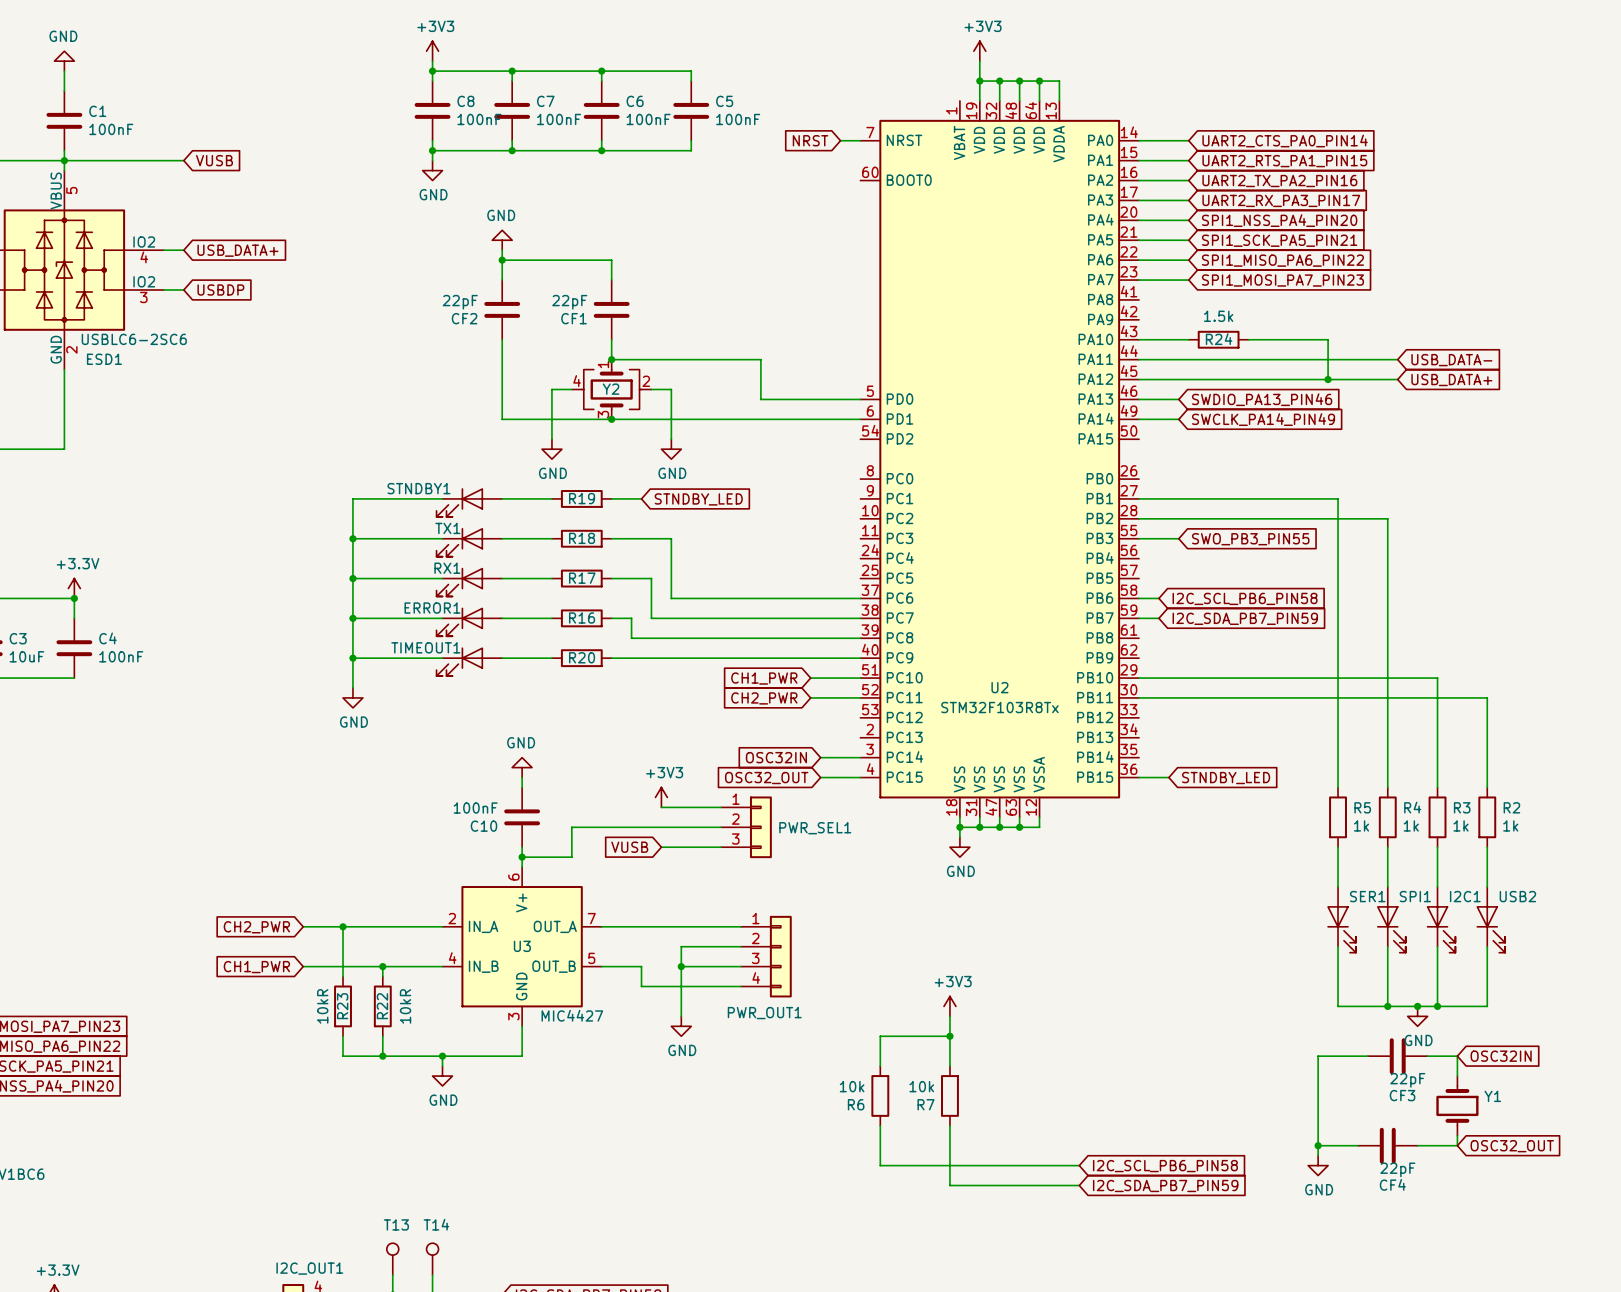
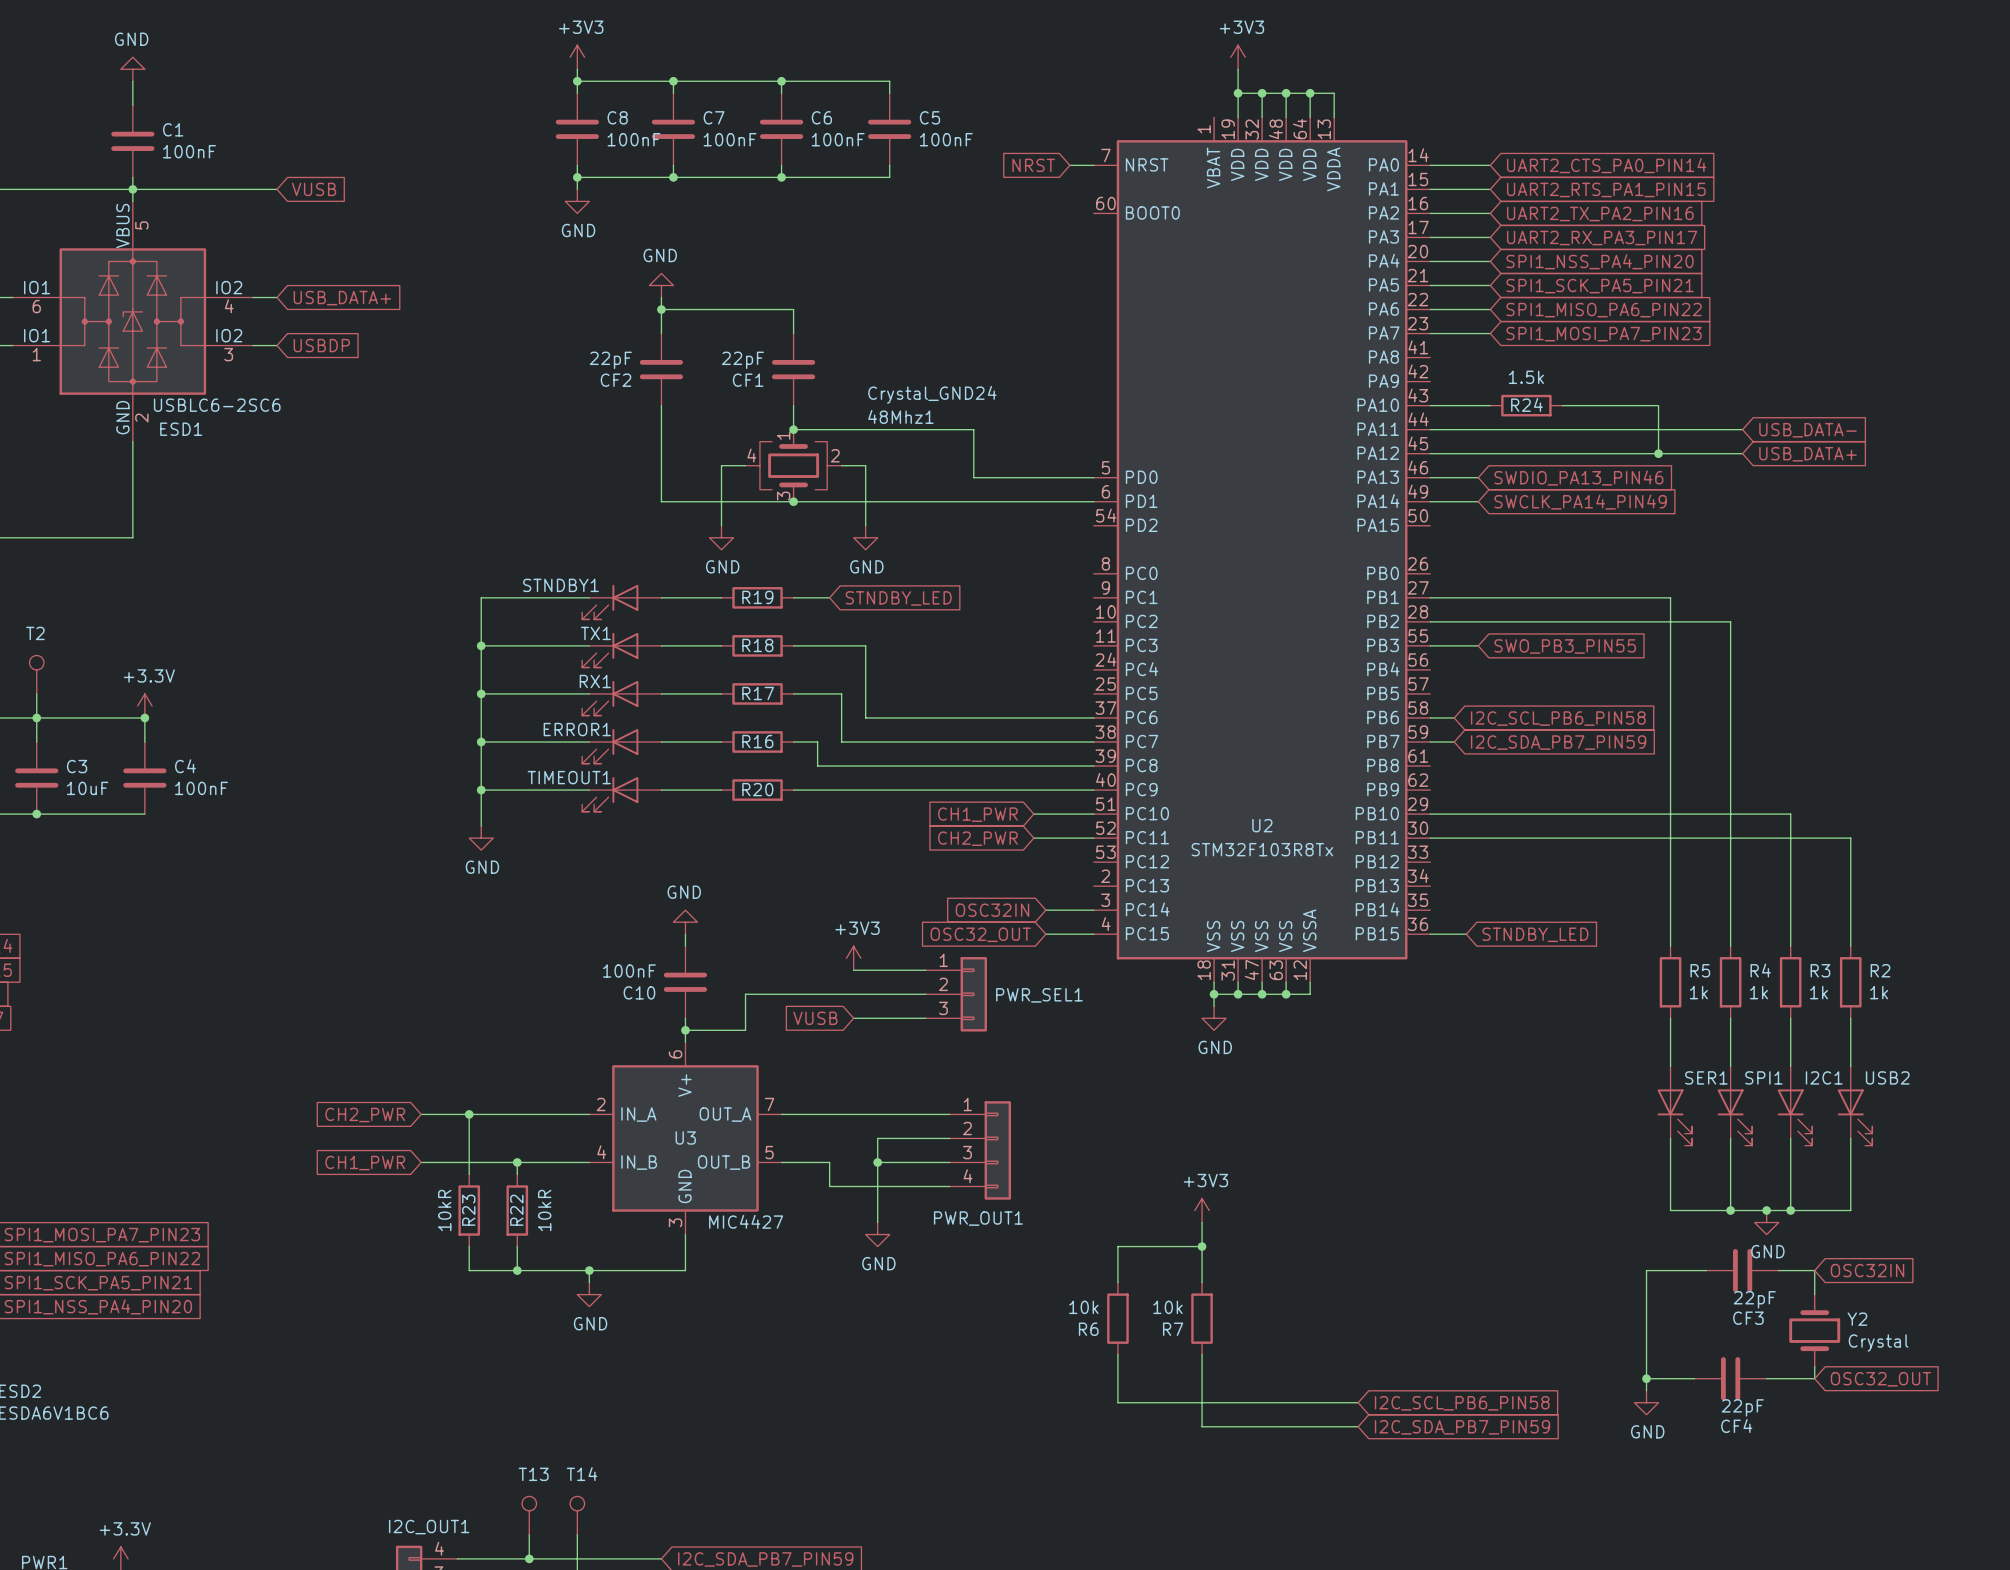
Y2 value: none -> Crystal_GND24 (932, 394)
Y2 name: Y2 (611, 389) -> 48Mhz1 (900, 416)
Y1 name: Y1 (1492, 1096) -> Y2 (1857, 1319)
Y1 value: none -> Crystal (1878, 1343)

